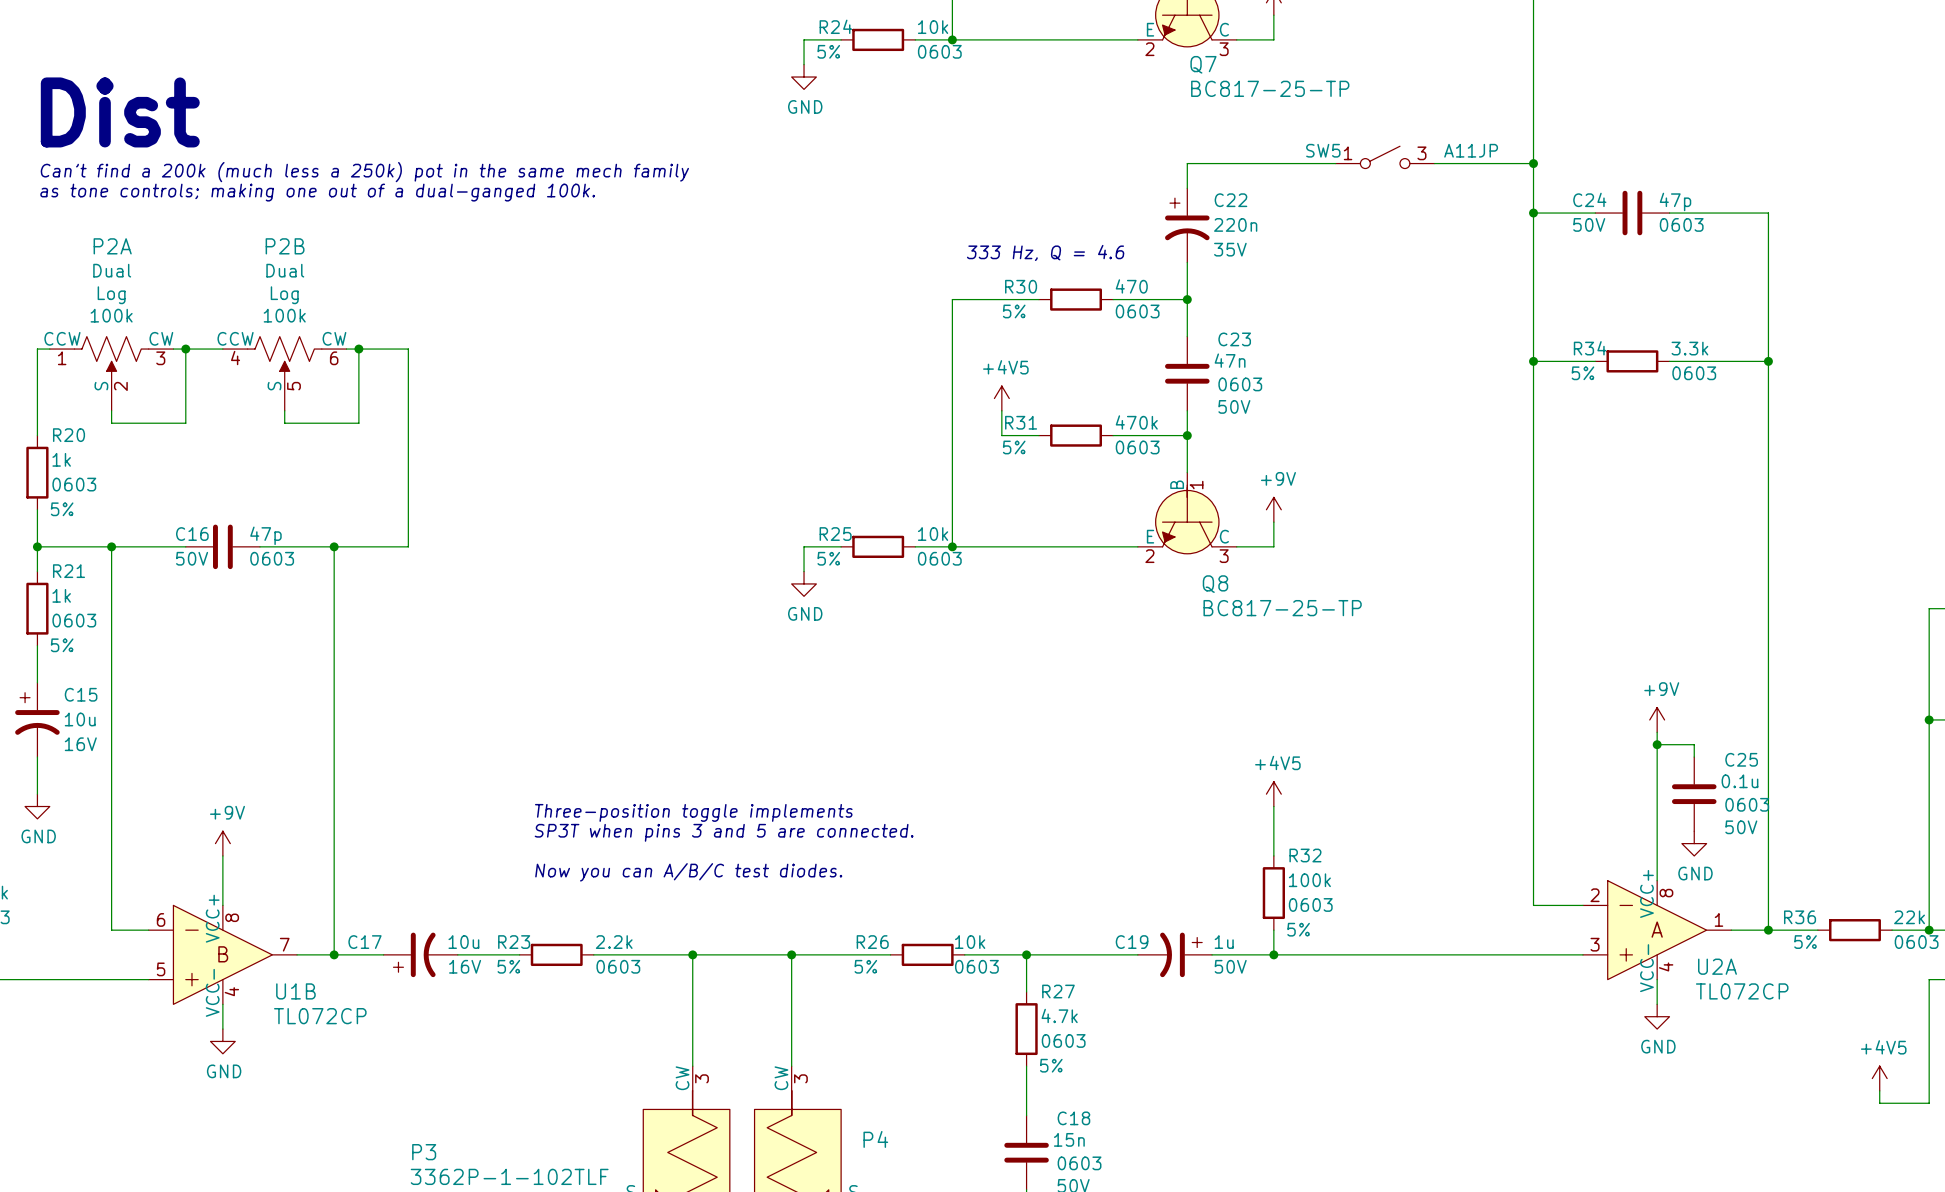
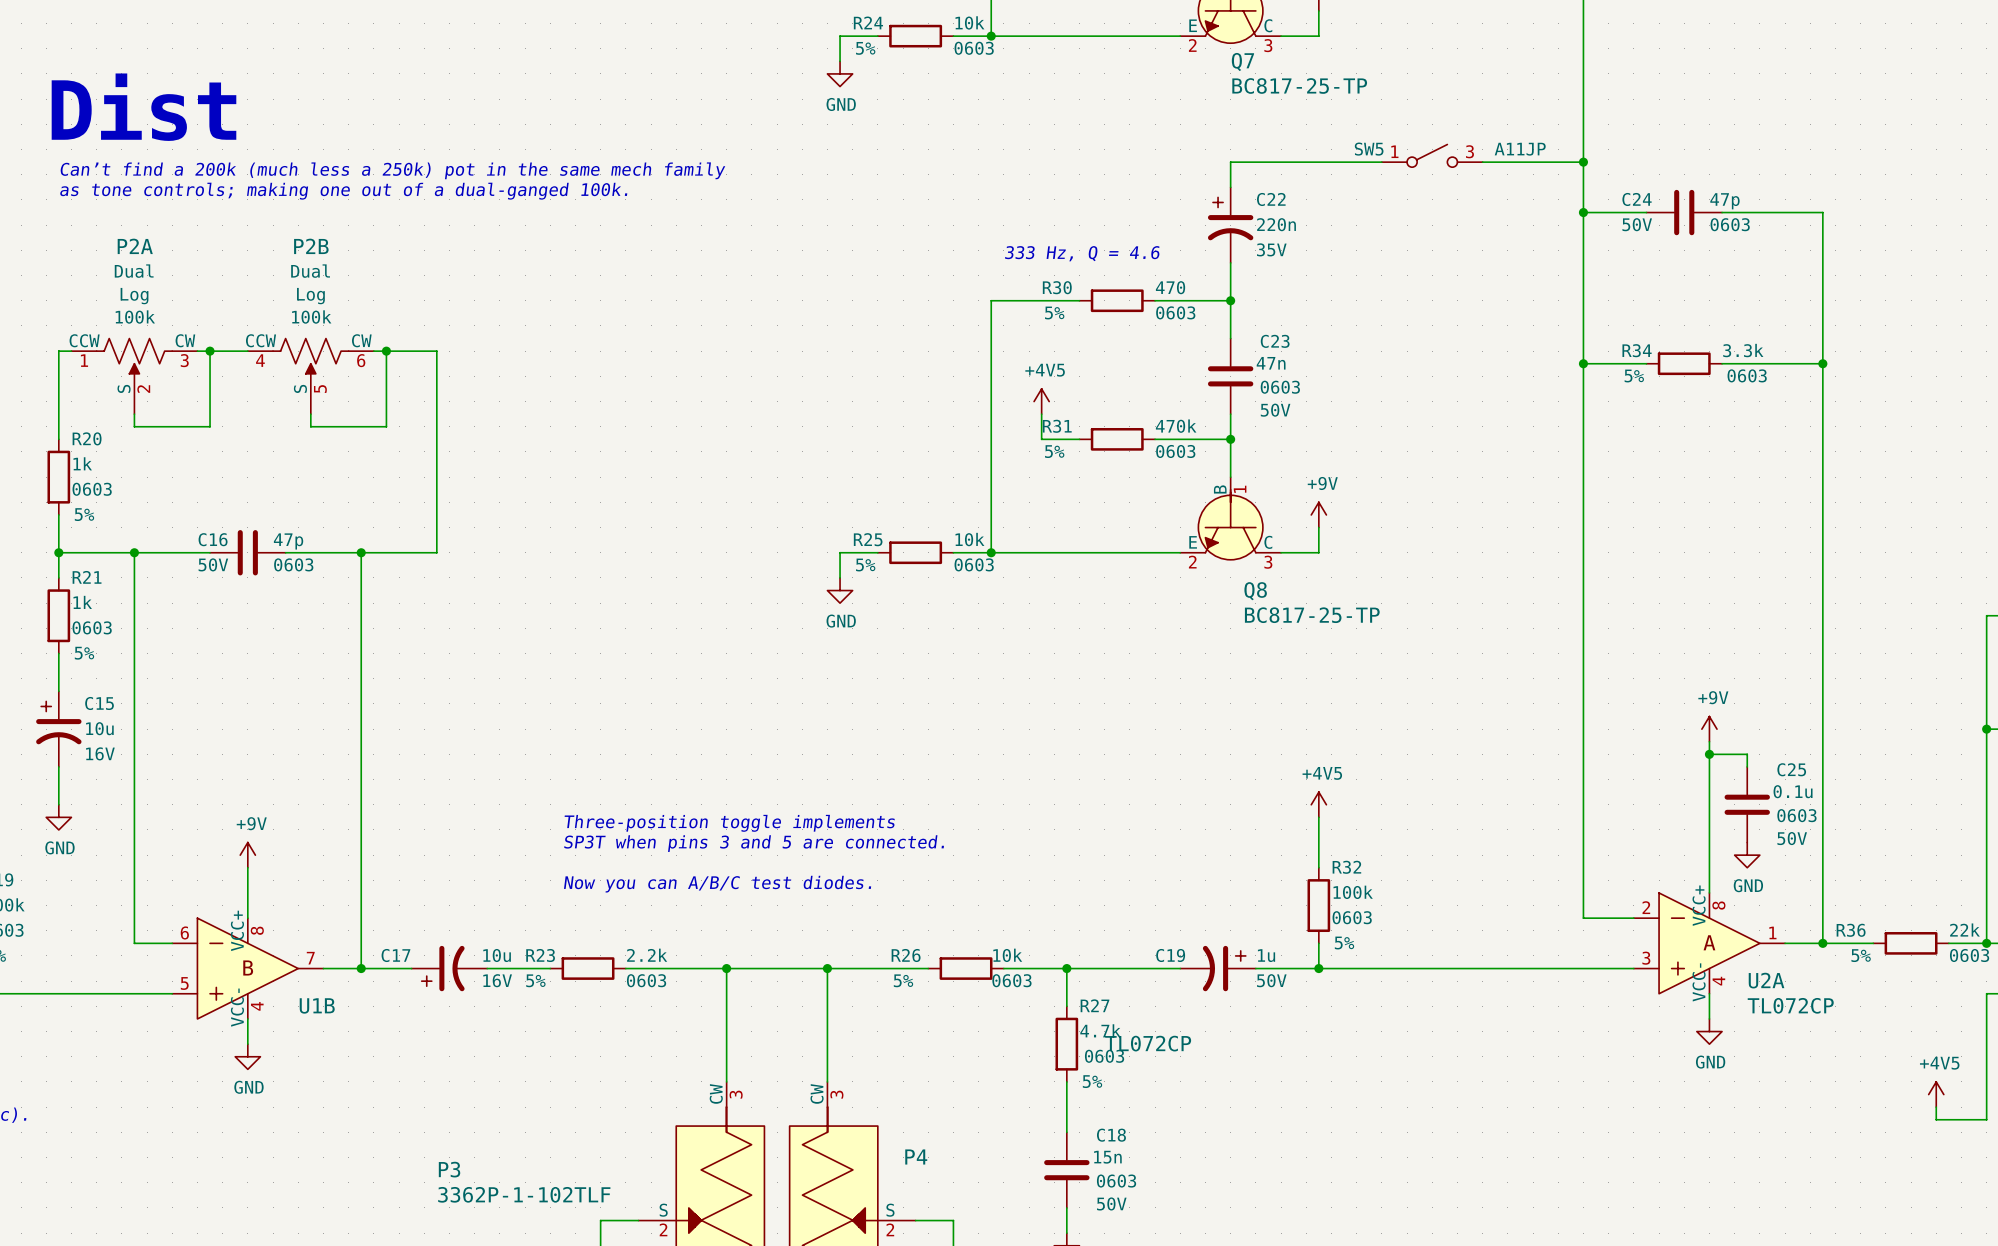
U1B value position: TL072CP (320, 1016) -> TL072CP (1148, 1043)

